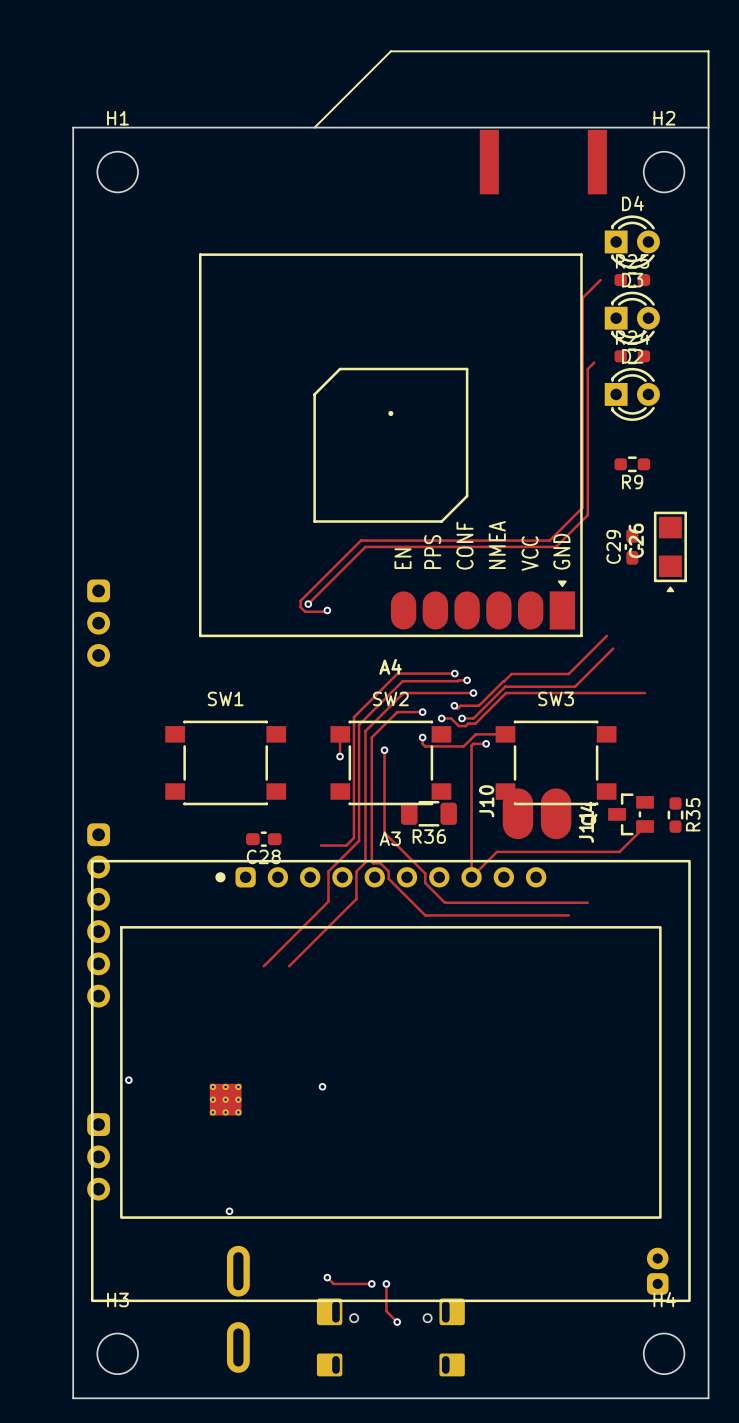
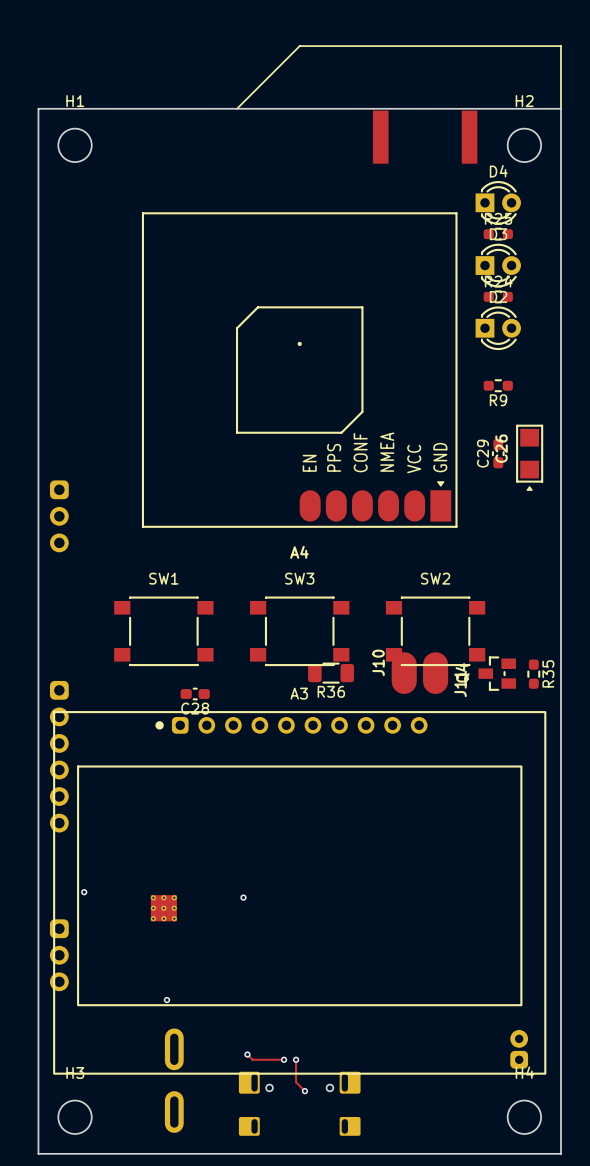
track: (600, 280) (582, 297) (582, 507) (549, 540) (361, 540) (300, 600) (300, 607) (305, 611) (327, 610) -> none
track: (594, 362) (587, 369) (587, 515) (556, 546) (365, 546) (308, 604) -> none
via: (308, 604) -> none
via: (327, 610) -> none
track: (606, 635) (568, 673) (511, 673) (478, 705) (460, 705) (457, 708) (454, 705) -> none
track: (613, 648) (575, 686) (505, 686) (473, 718) (462, 718) -> none
track: (454, 673) (397, 673) (353, 717) (353, 837) (346, 845) (320, 845) -> none
via: (454, 673) -> none
track: (467, 680) (402, 681) (359, 724) (359, 840) (328, 871) (328, 901) (263, 966) -> none
via: (467, 680) -> none
track: (473, 693) (403, 693) (365, 731) (365, 862) (356, 871) (356, 899) (289, 966) -> none
via: (473, 693) -> none
track: (645, 693) (506, 693) (475, 723) (458, 726) (451, 718) (441, 718) -> none
SW2 name: SW2 (390, 698) -> SW3 (299, 578)
SW3 name: SW3 (556, 698) -> SW2 (435, 578)
via: (454, 705) -> none
track: (422, 712) (397, 712) (371, 737) (371, 861) (380, 863) (388, 871) (388, 878) (425, 915) (568, 915) -> none
via: (422, 712) -> none
via: (441, 718) -> none
via: (462, 718) -> none
track: (340, 734) (340, 756) -> none
track: (505, 734) (475, 734) (463, 746) (425, 746) (422, 743) (422, 737) -> none
via: (422, 737) -> none
track: (486, 743) (473, 743) (471, 745) (471, 877) (496, 851) (619, 851) (645, 826) -> none
via: (486, 743) -> none
track: (384, 750) (384, 832) (425, 873) (425, 883) (444, 902) (587, 902) -> none
via: (384, 750) -> none
via: (340, 756) -> none

